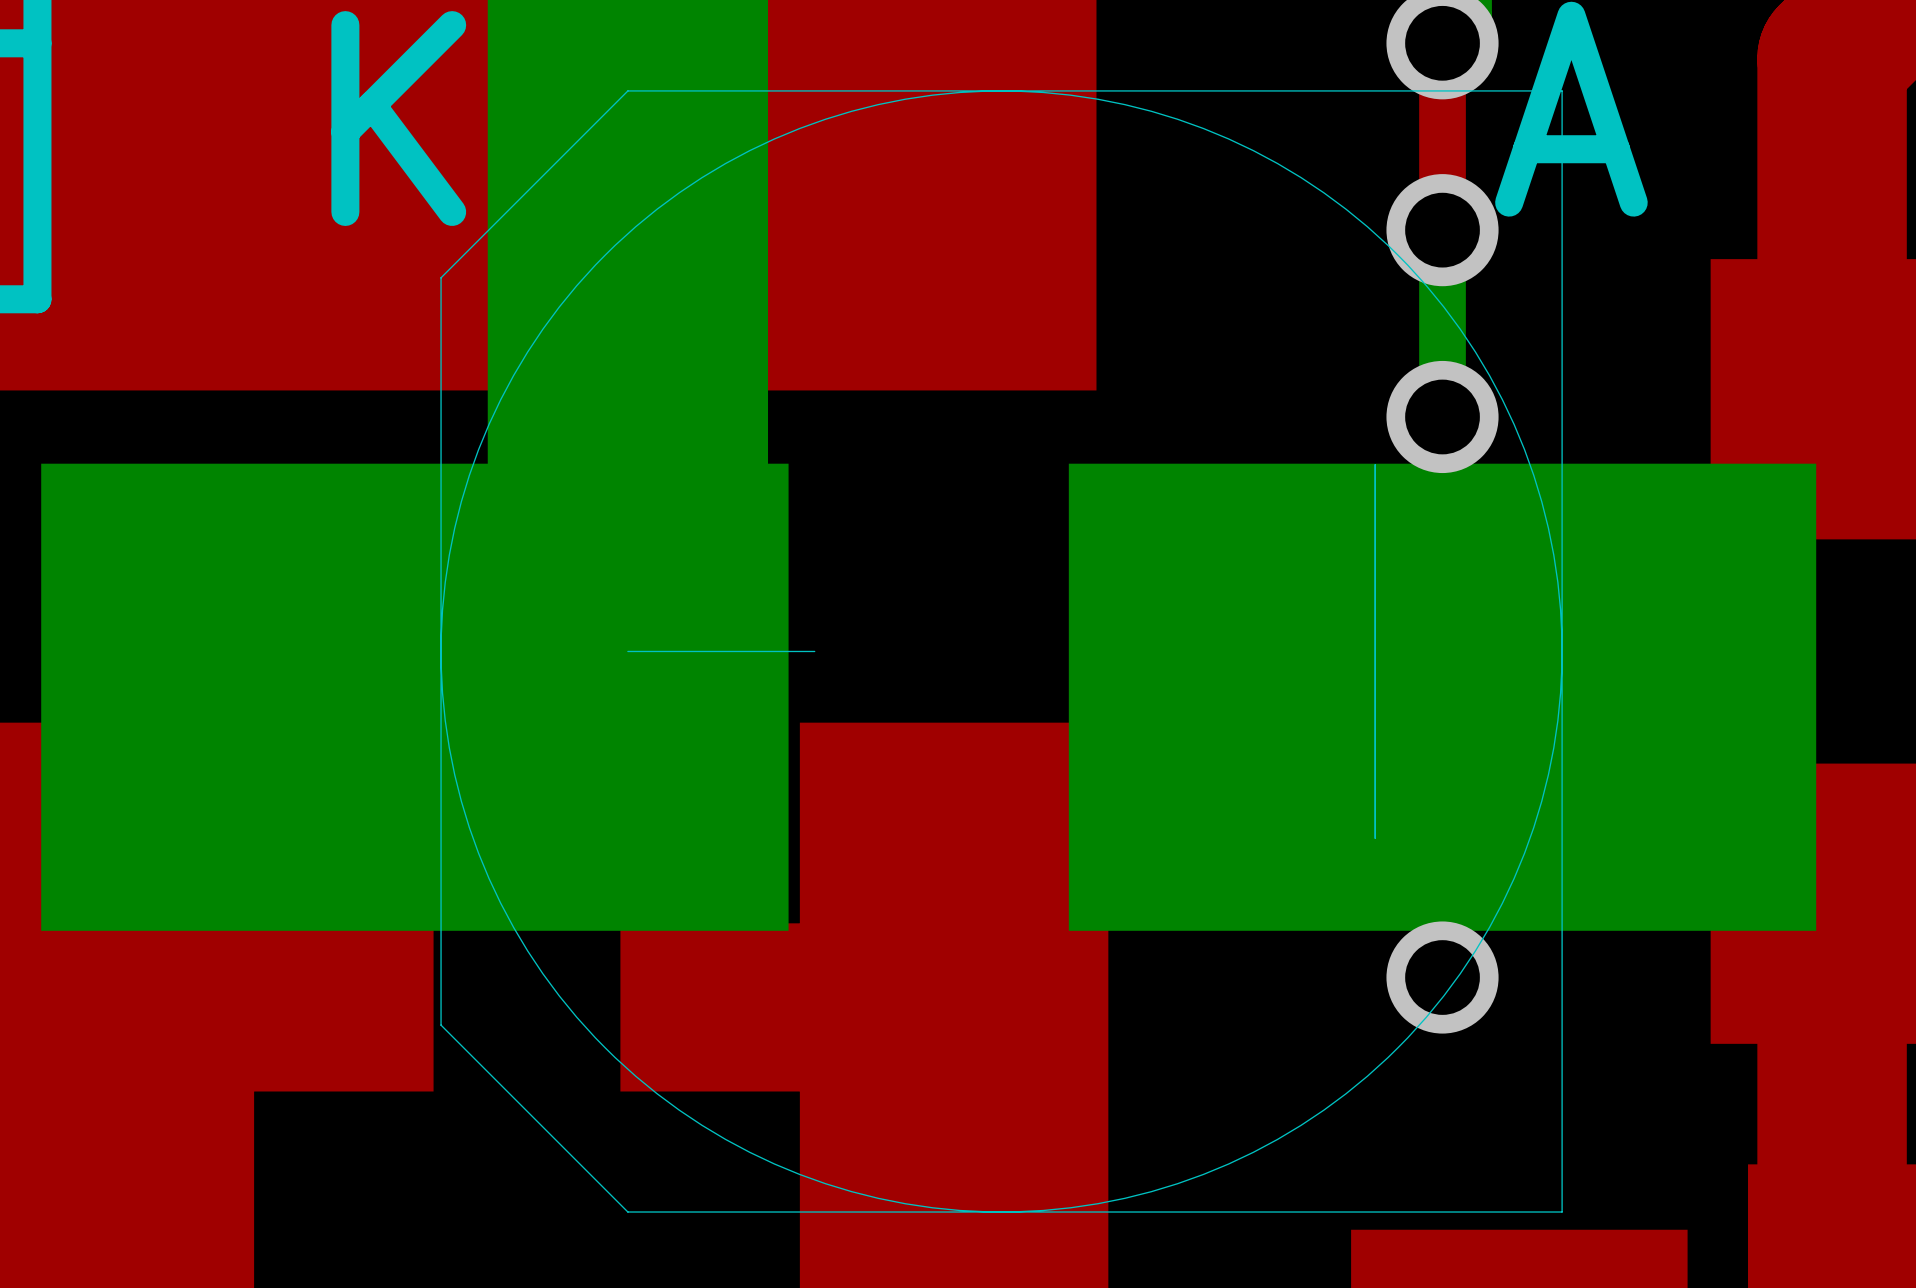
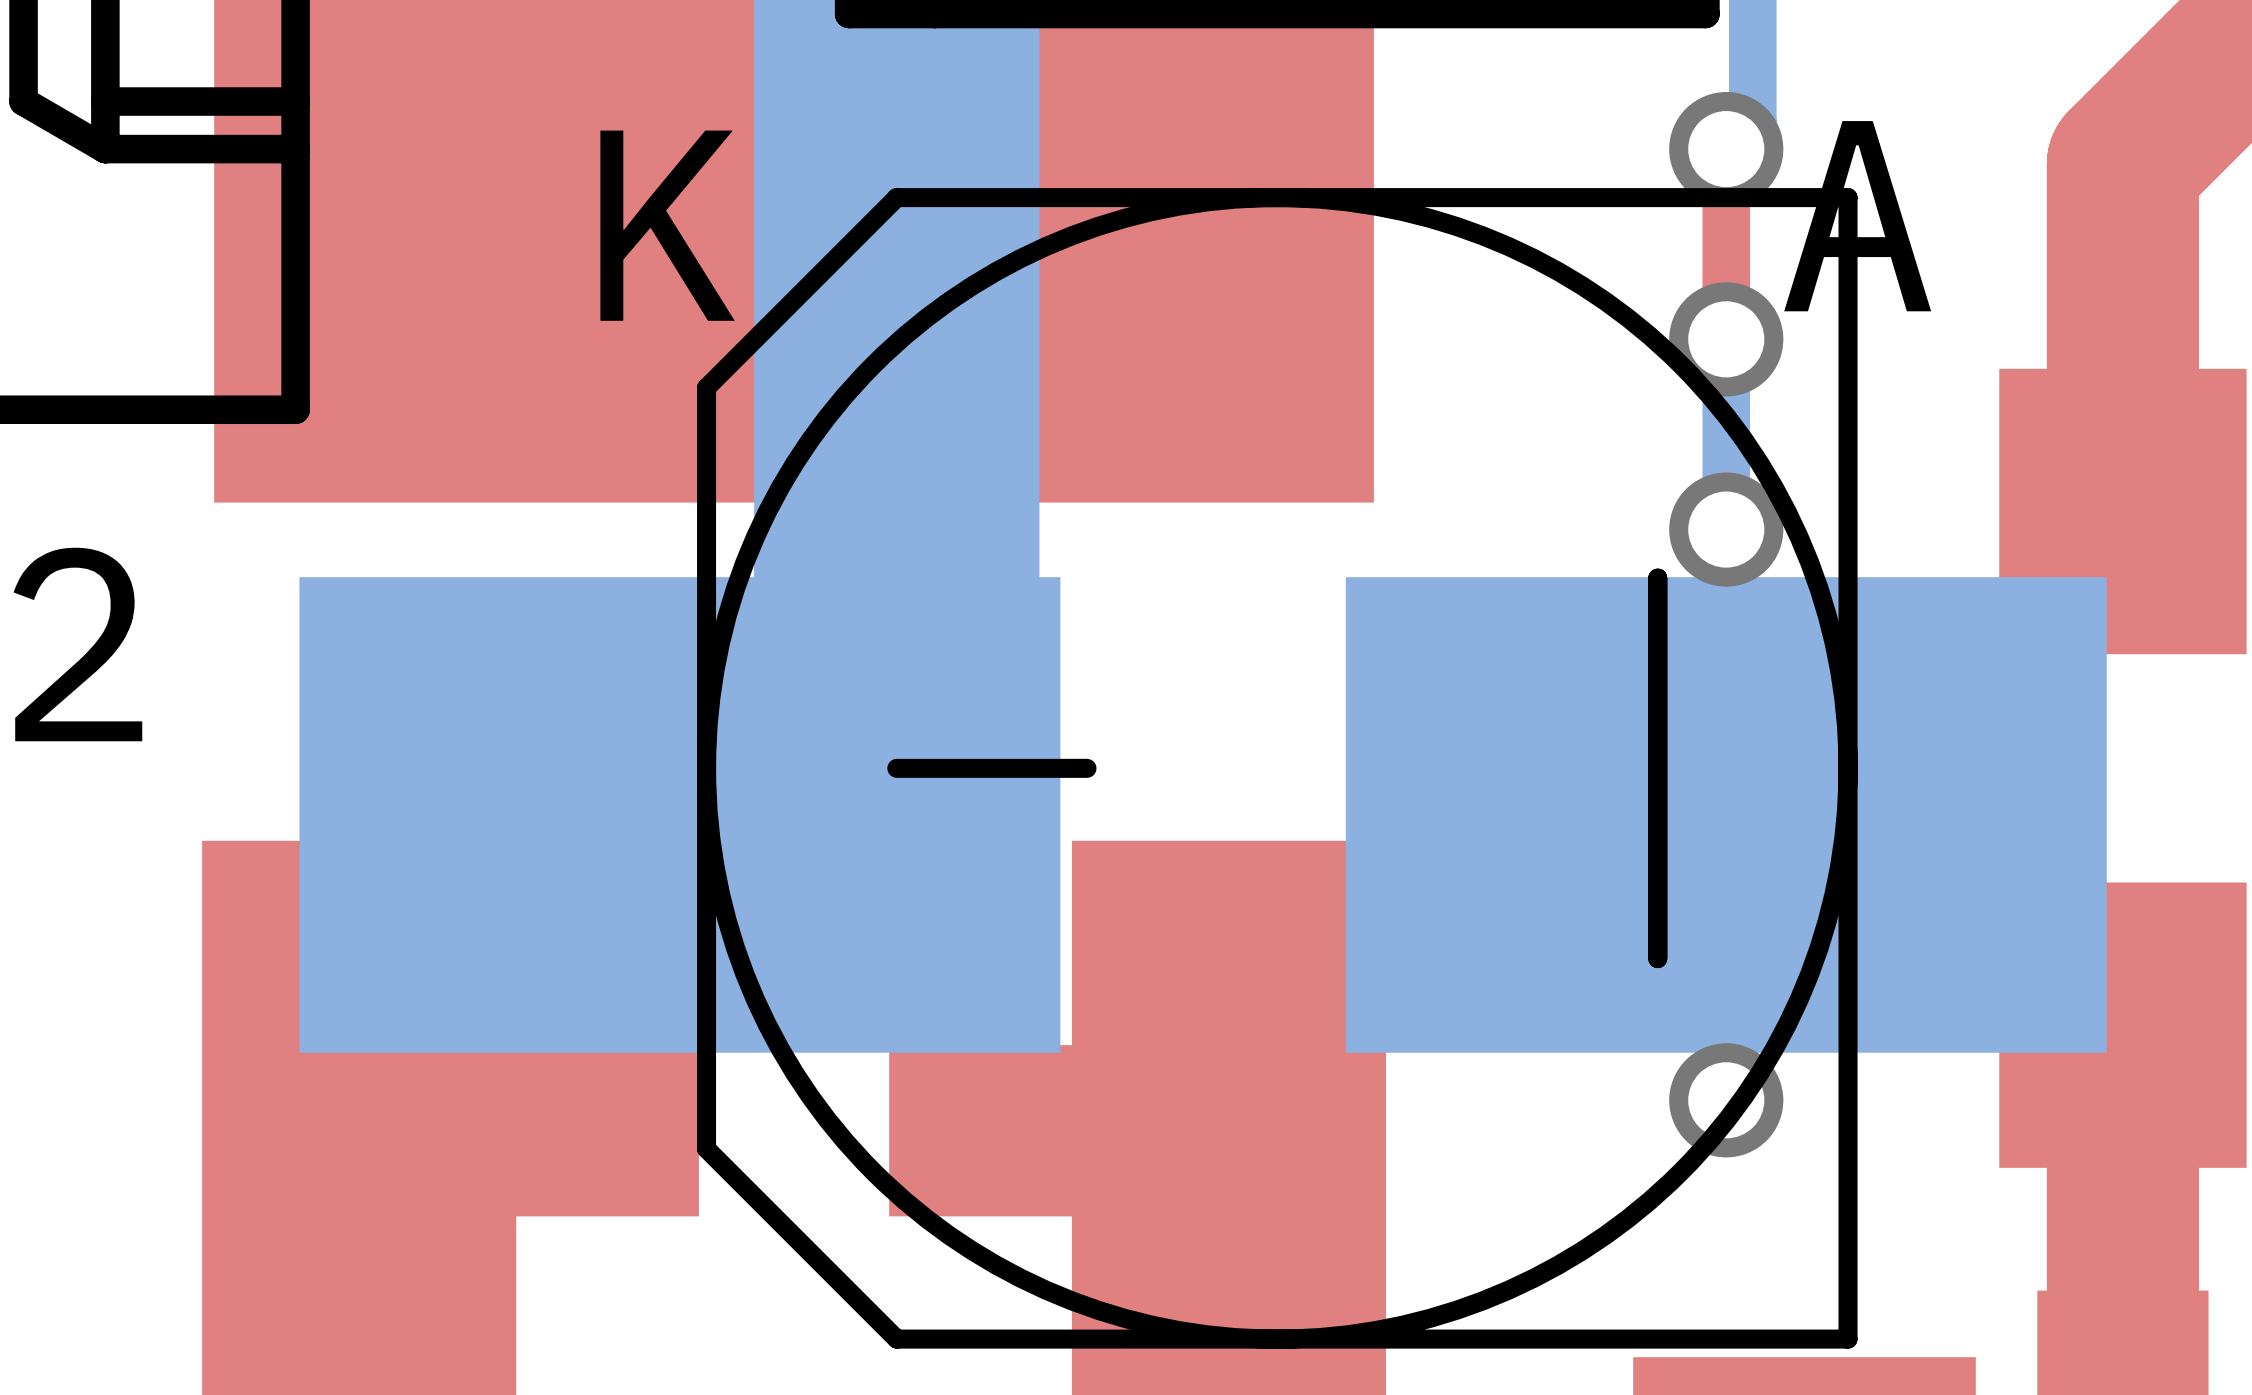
part footprint: [41, 90, 1817, 1213] -> [299, 188, 2107, 1349]

